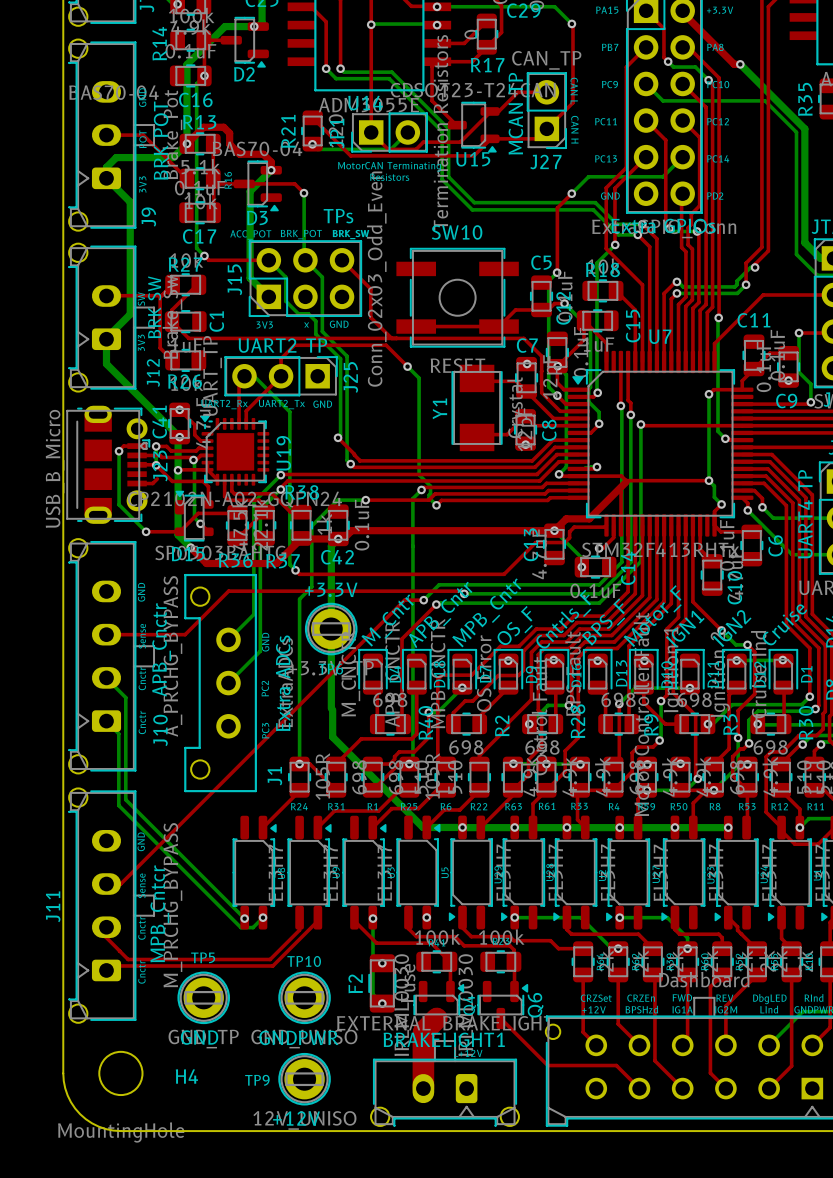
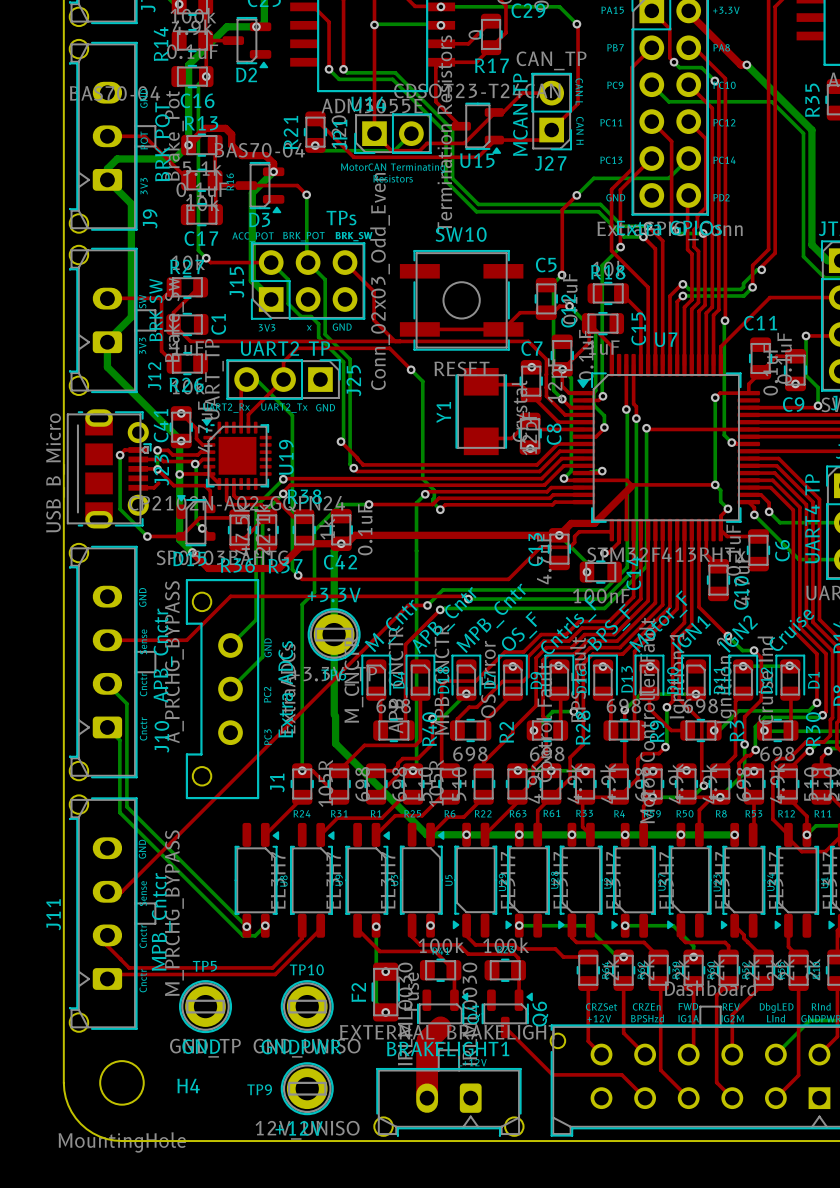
C14 value: 0.1uF (595, 590) -> 100nF (601, 596)

